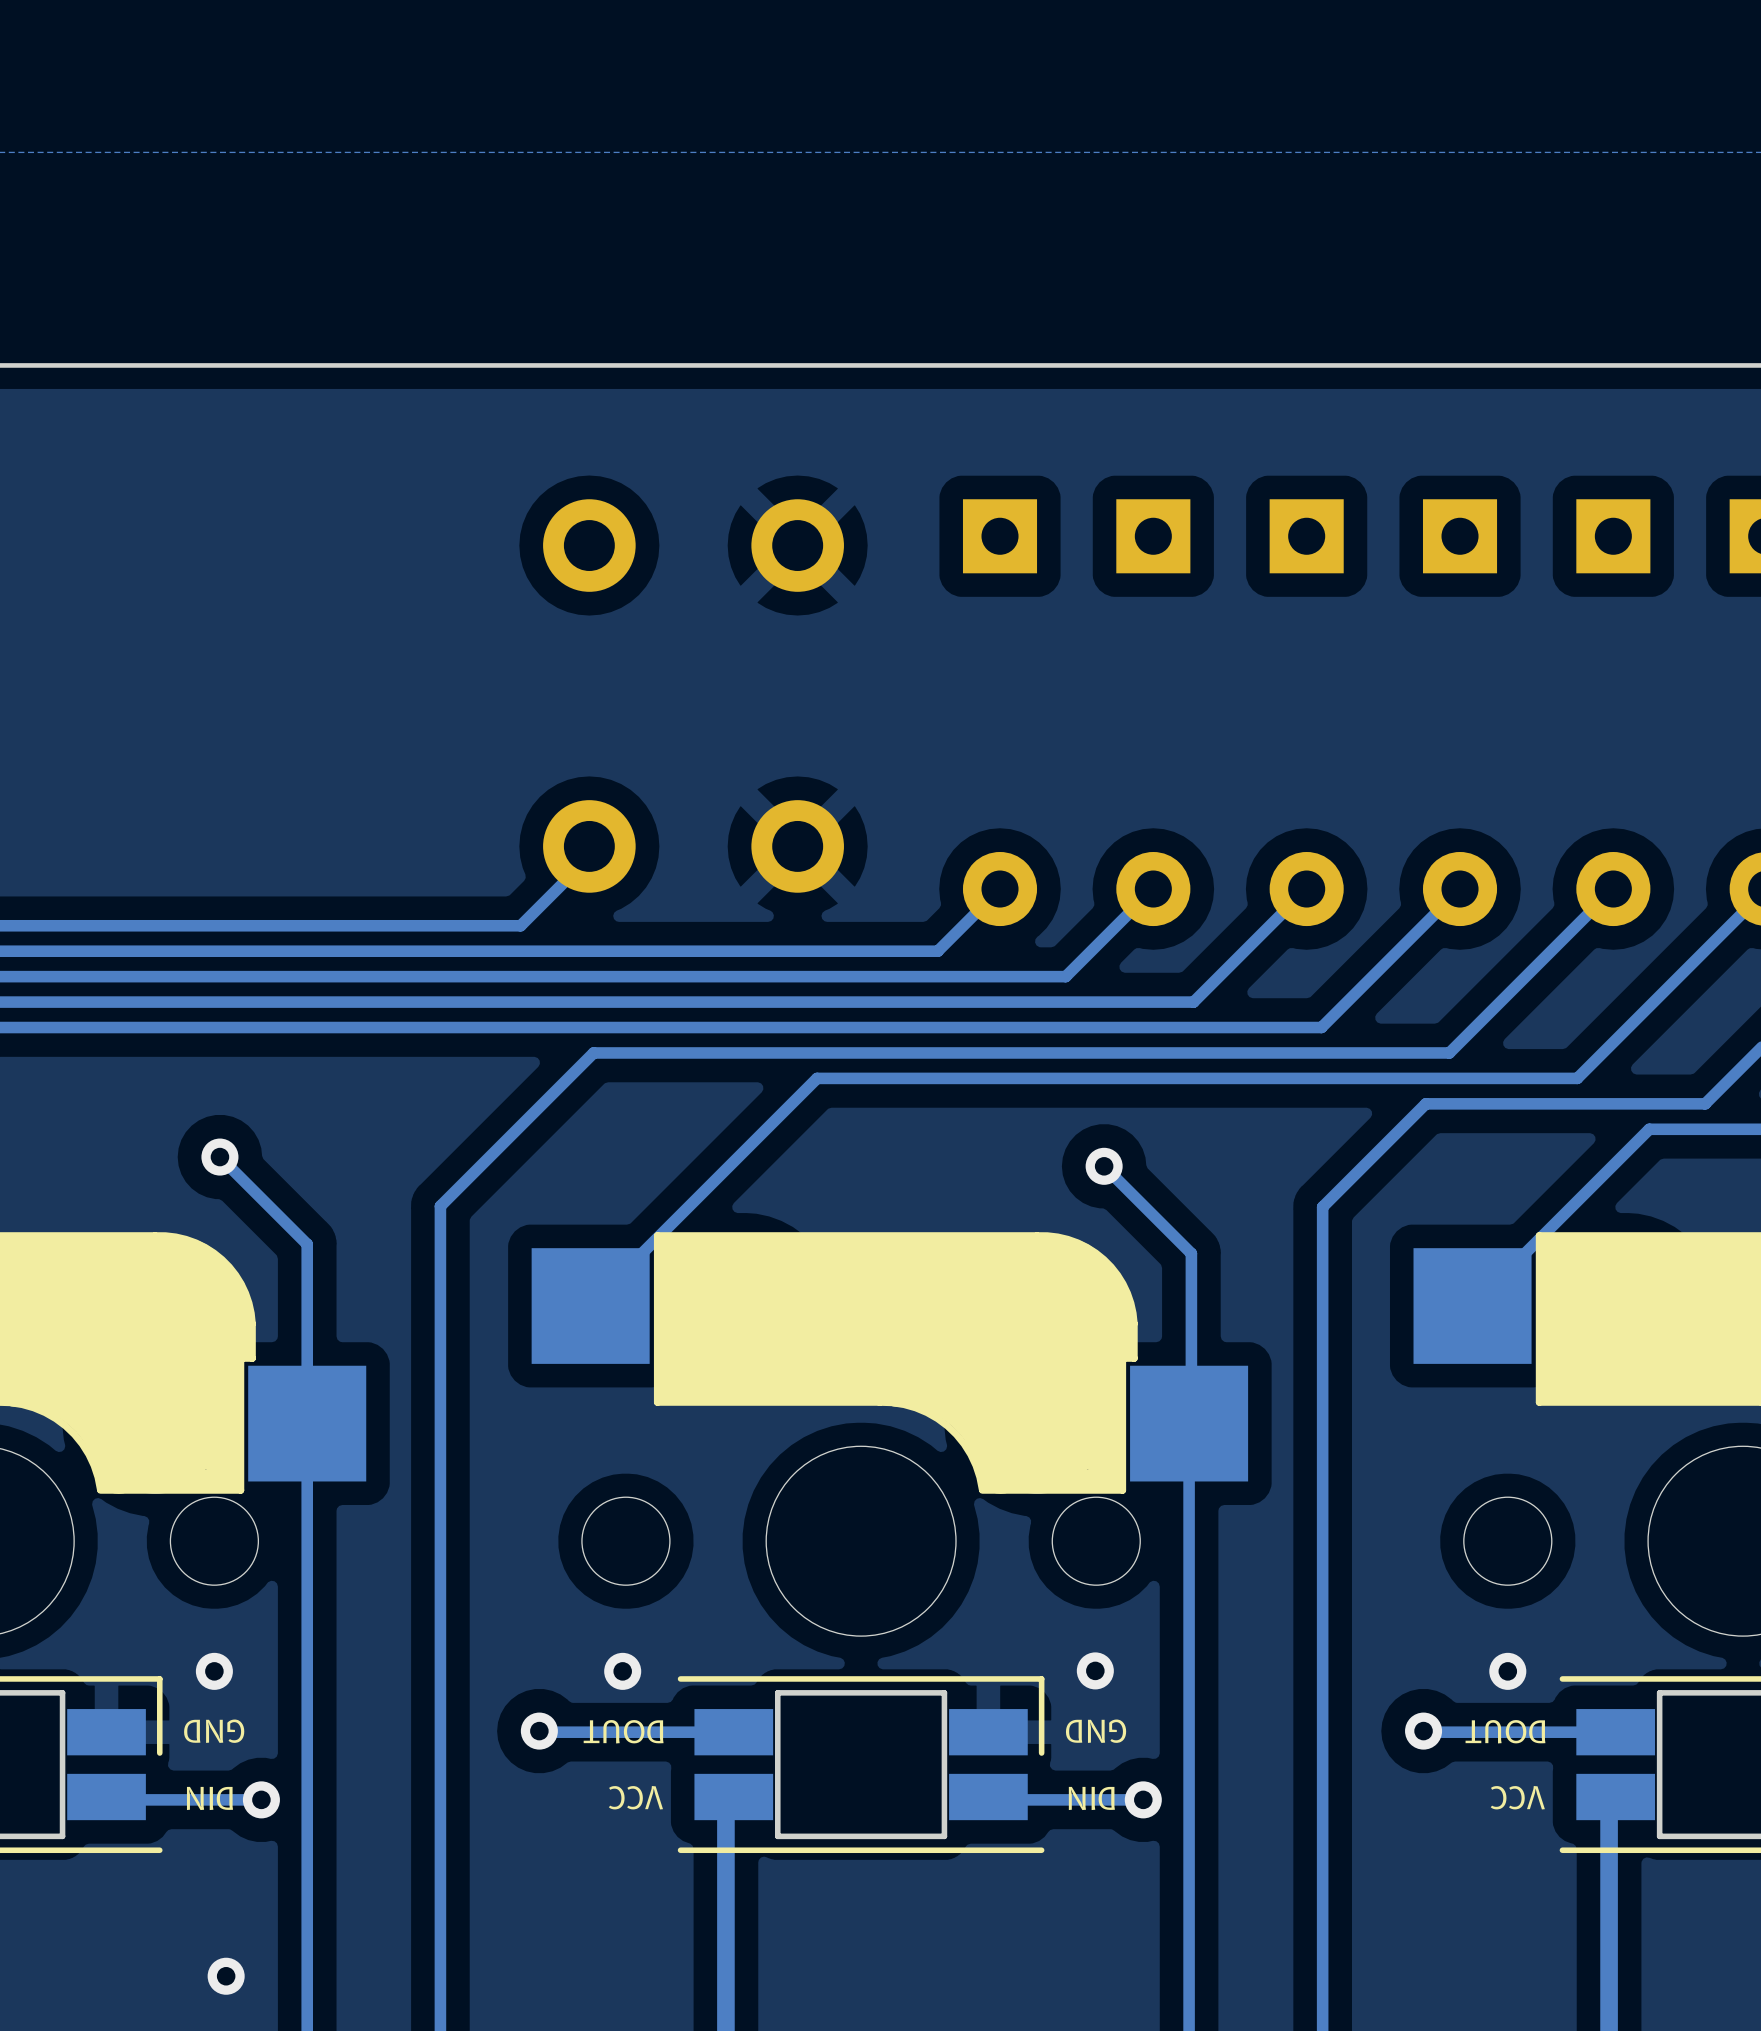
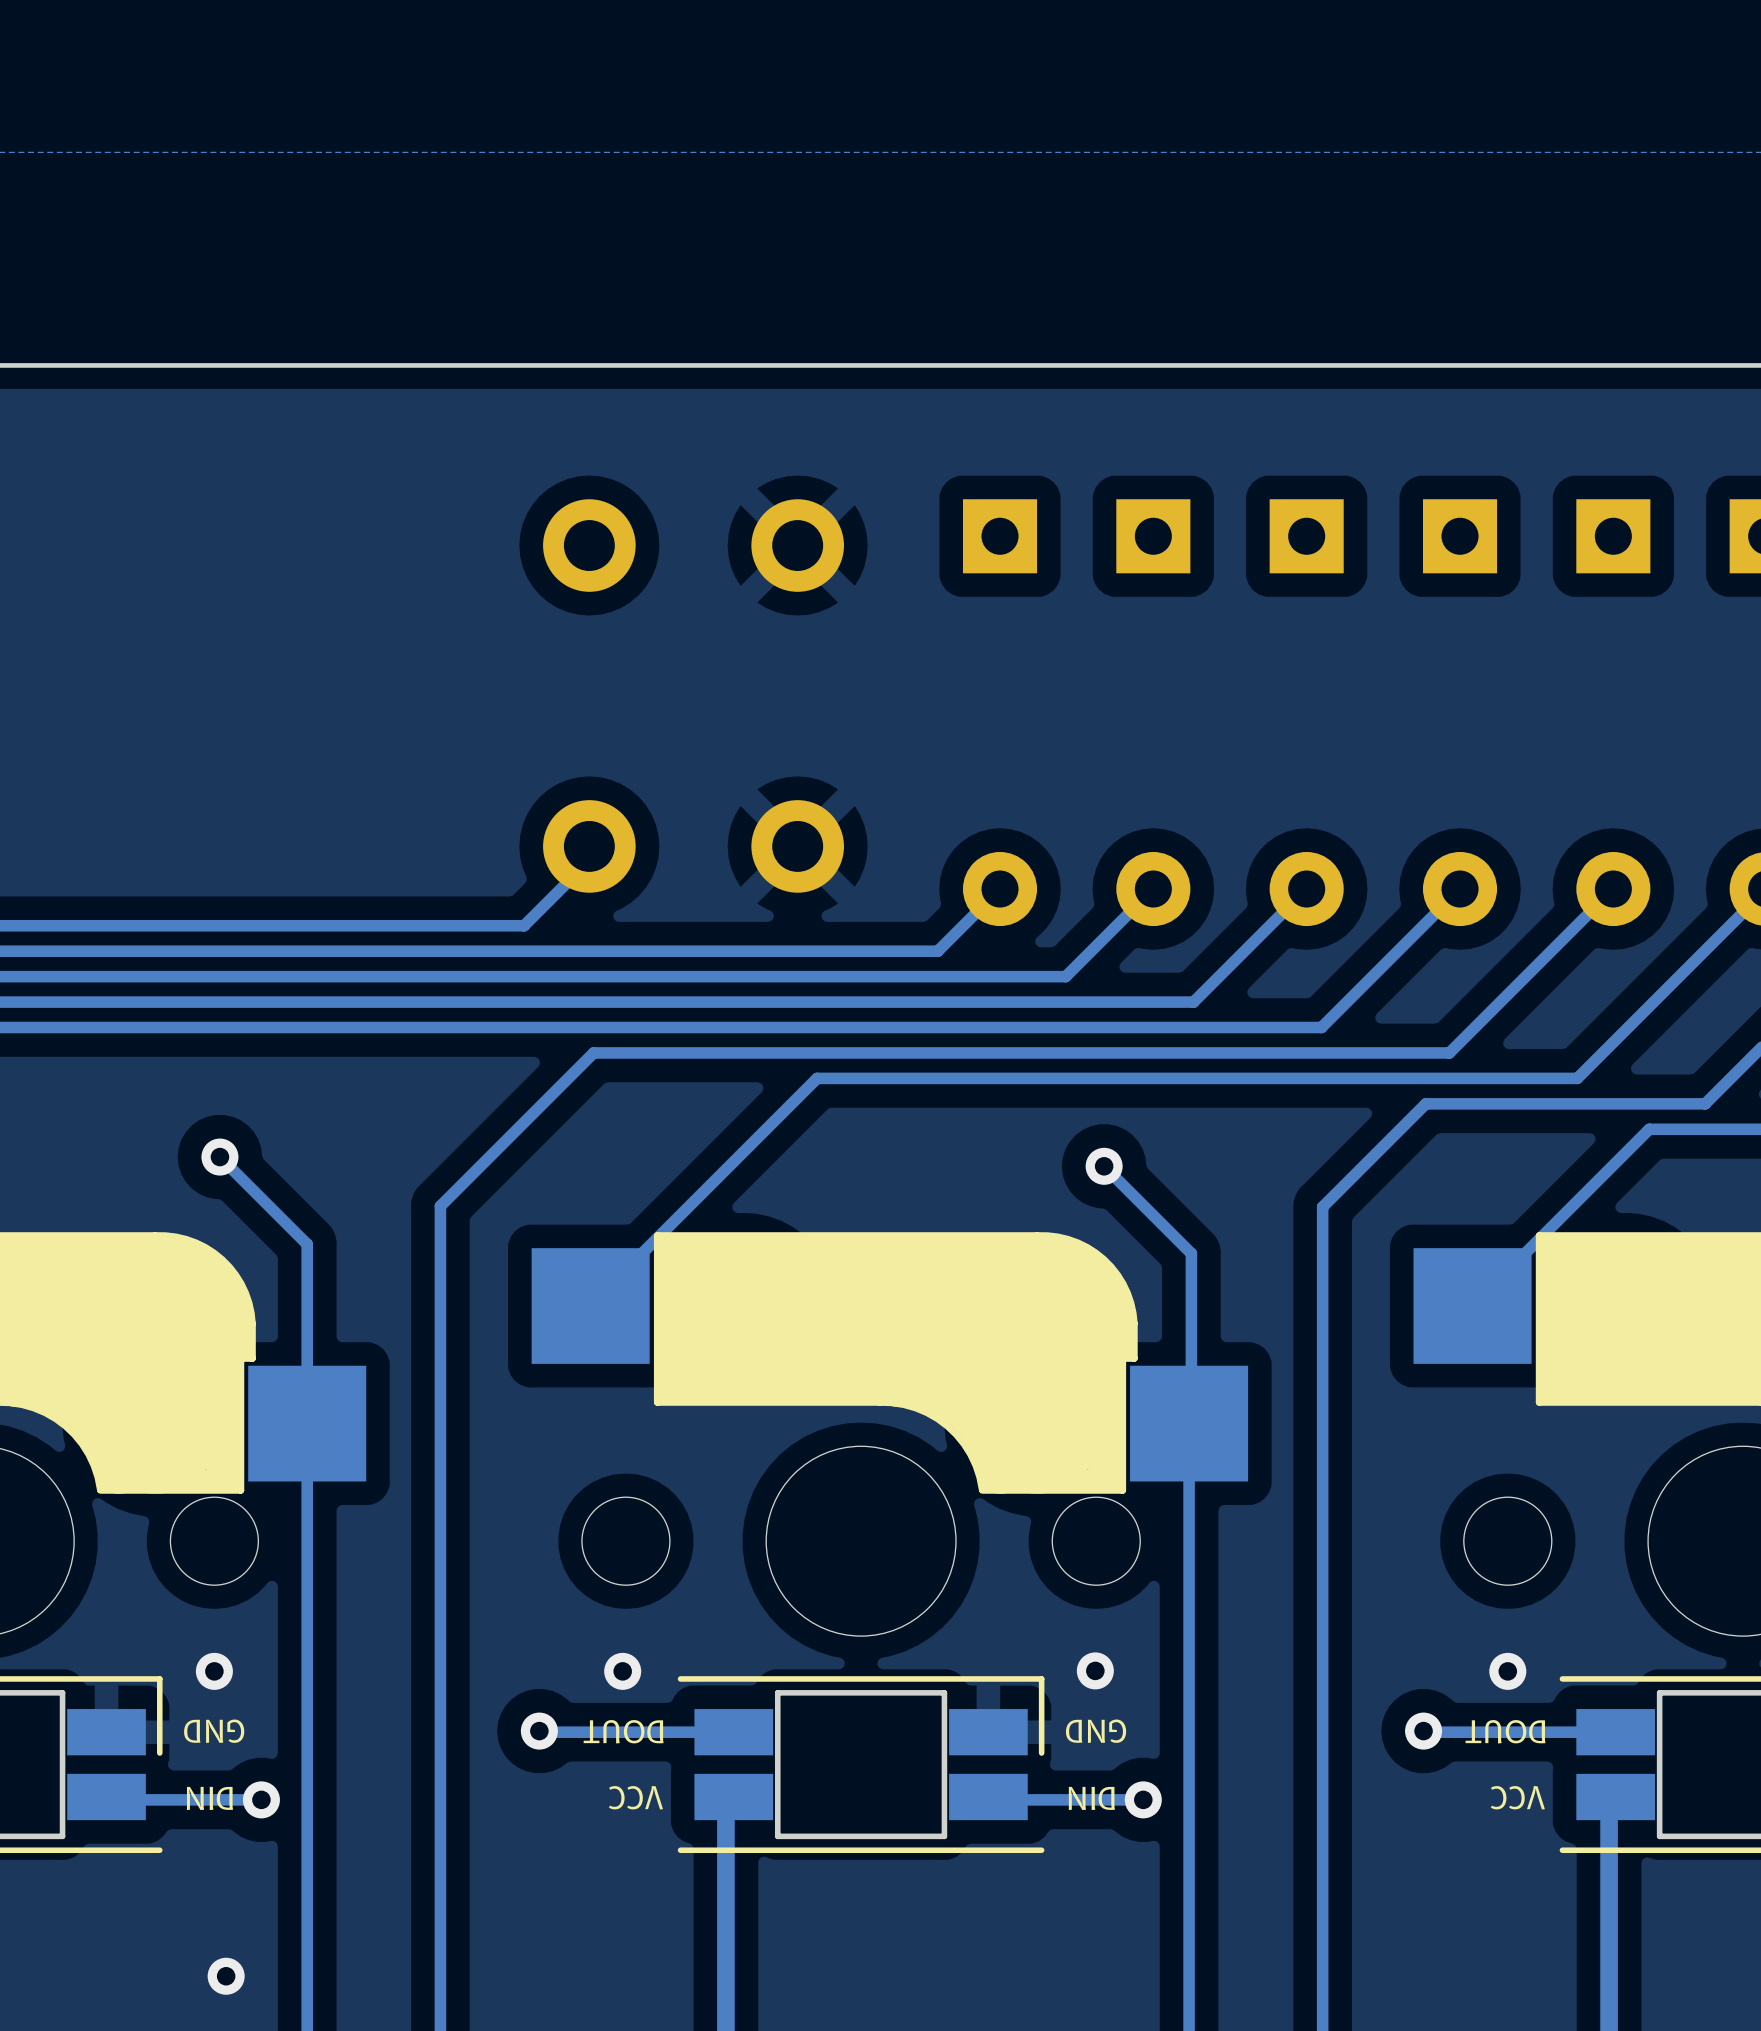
track: (587, 858) (520, 925) -> (589, 846) (589, 860) (524, 925) (520, 925)

